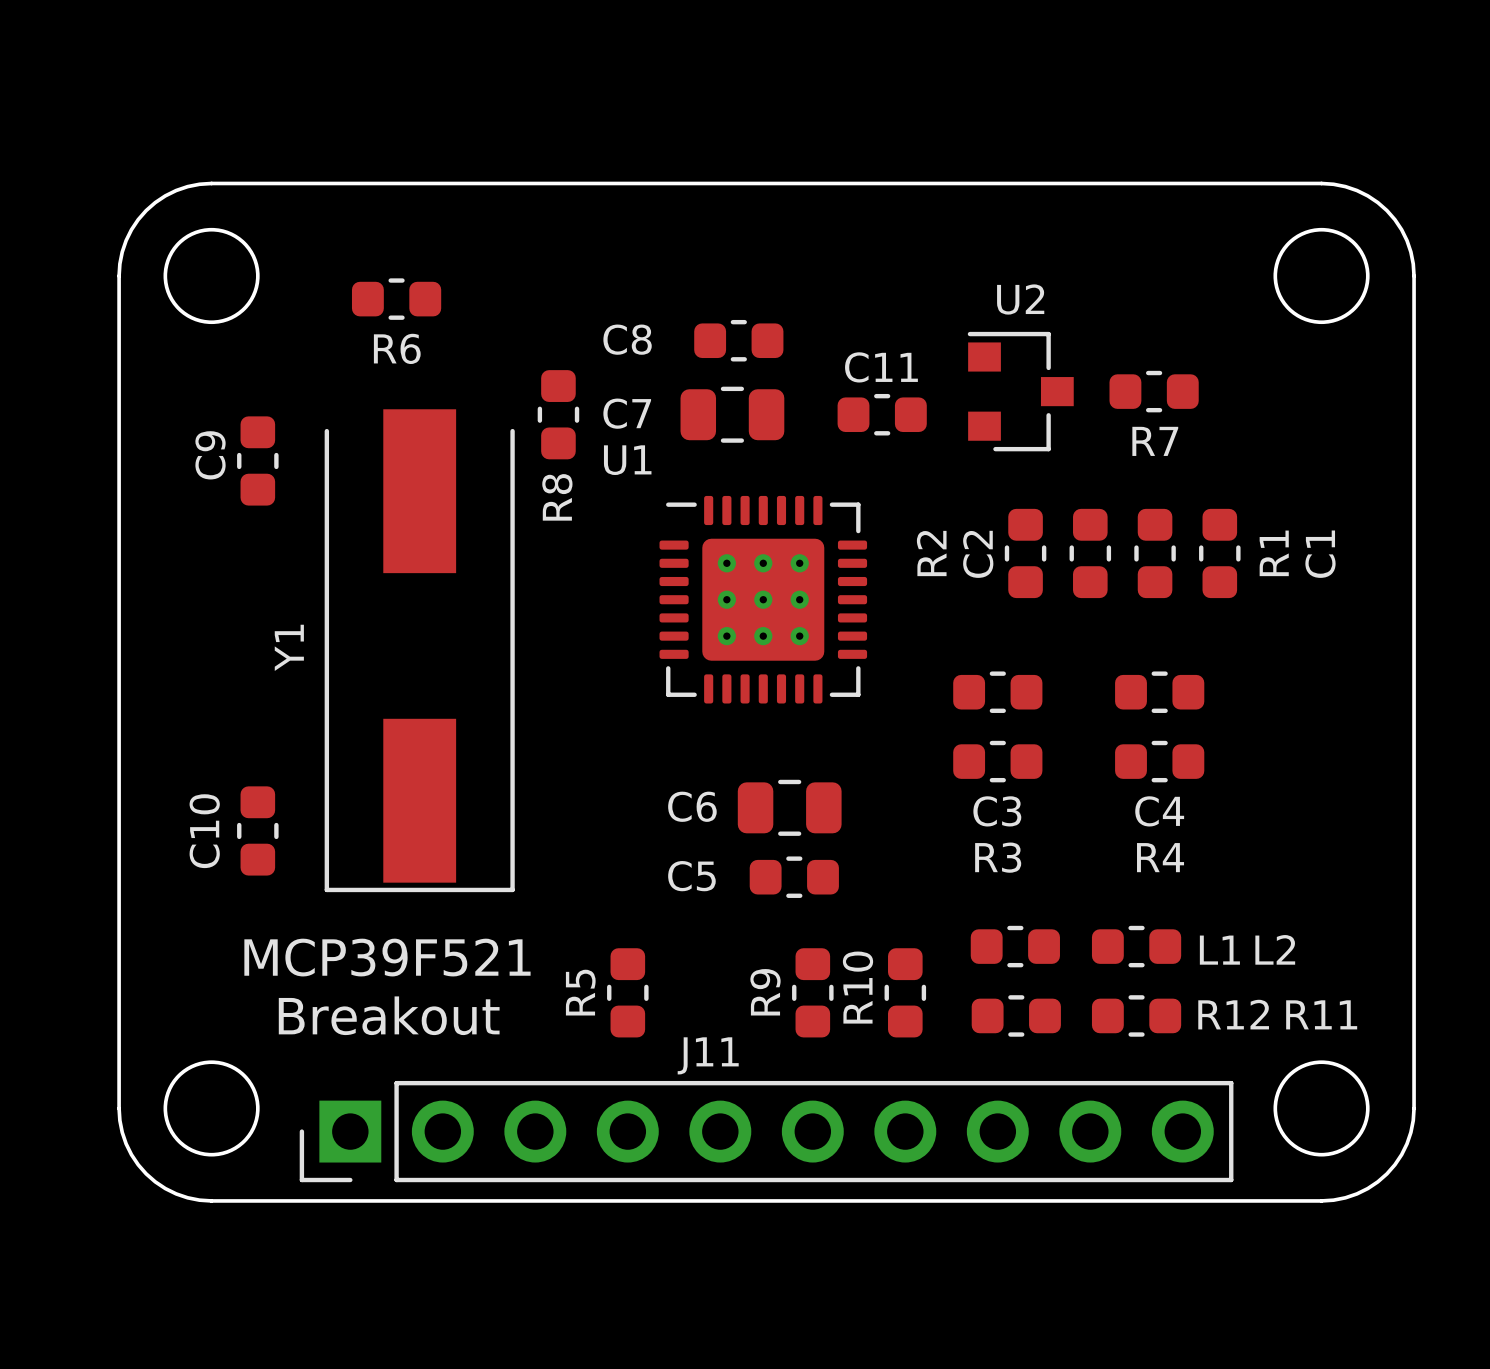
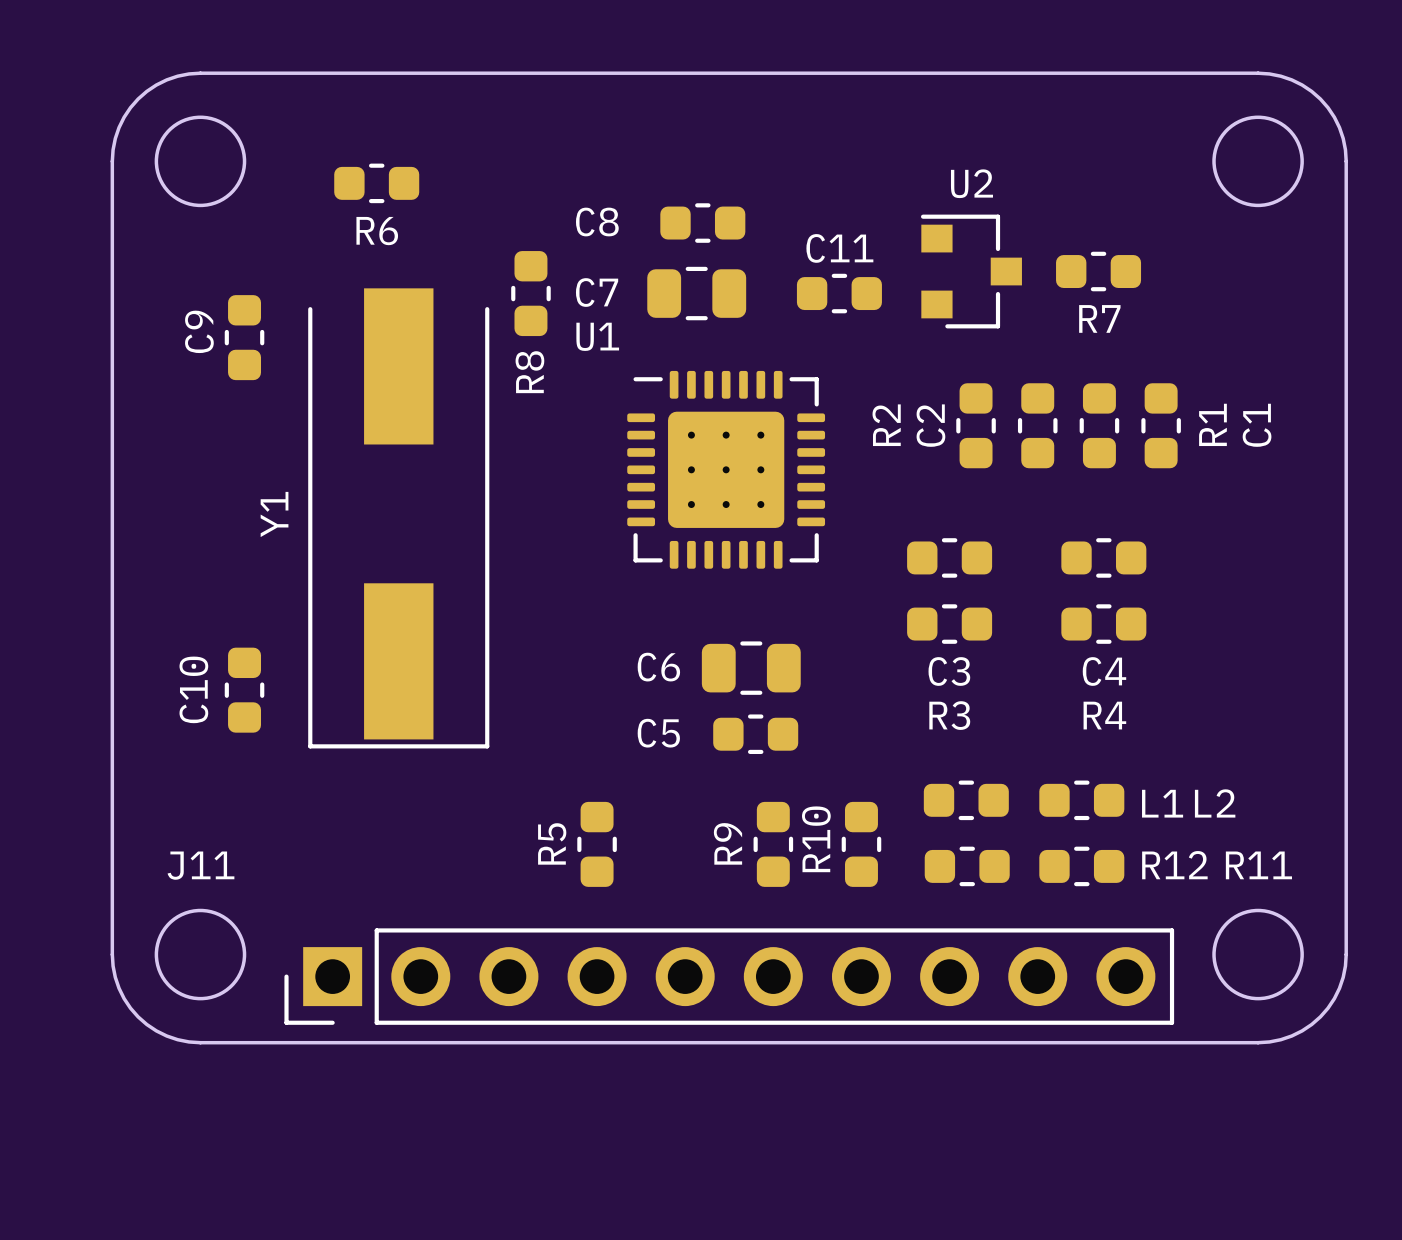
text: MCP39F521 (387, 957) -> none
text: Breakout (389, 1015) -> none
J11 name position: J11 (708, 1055) -> J11 (200, 865)

